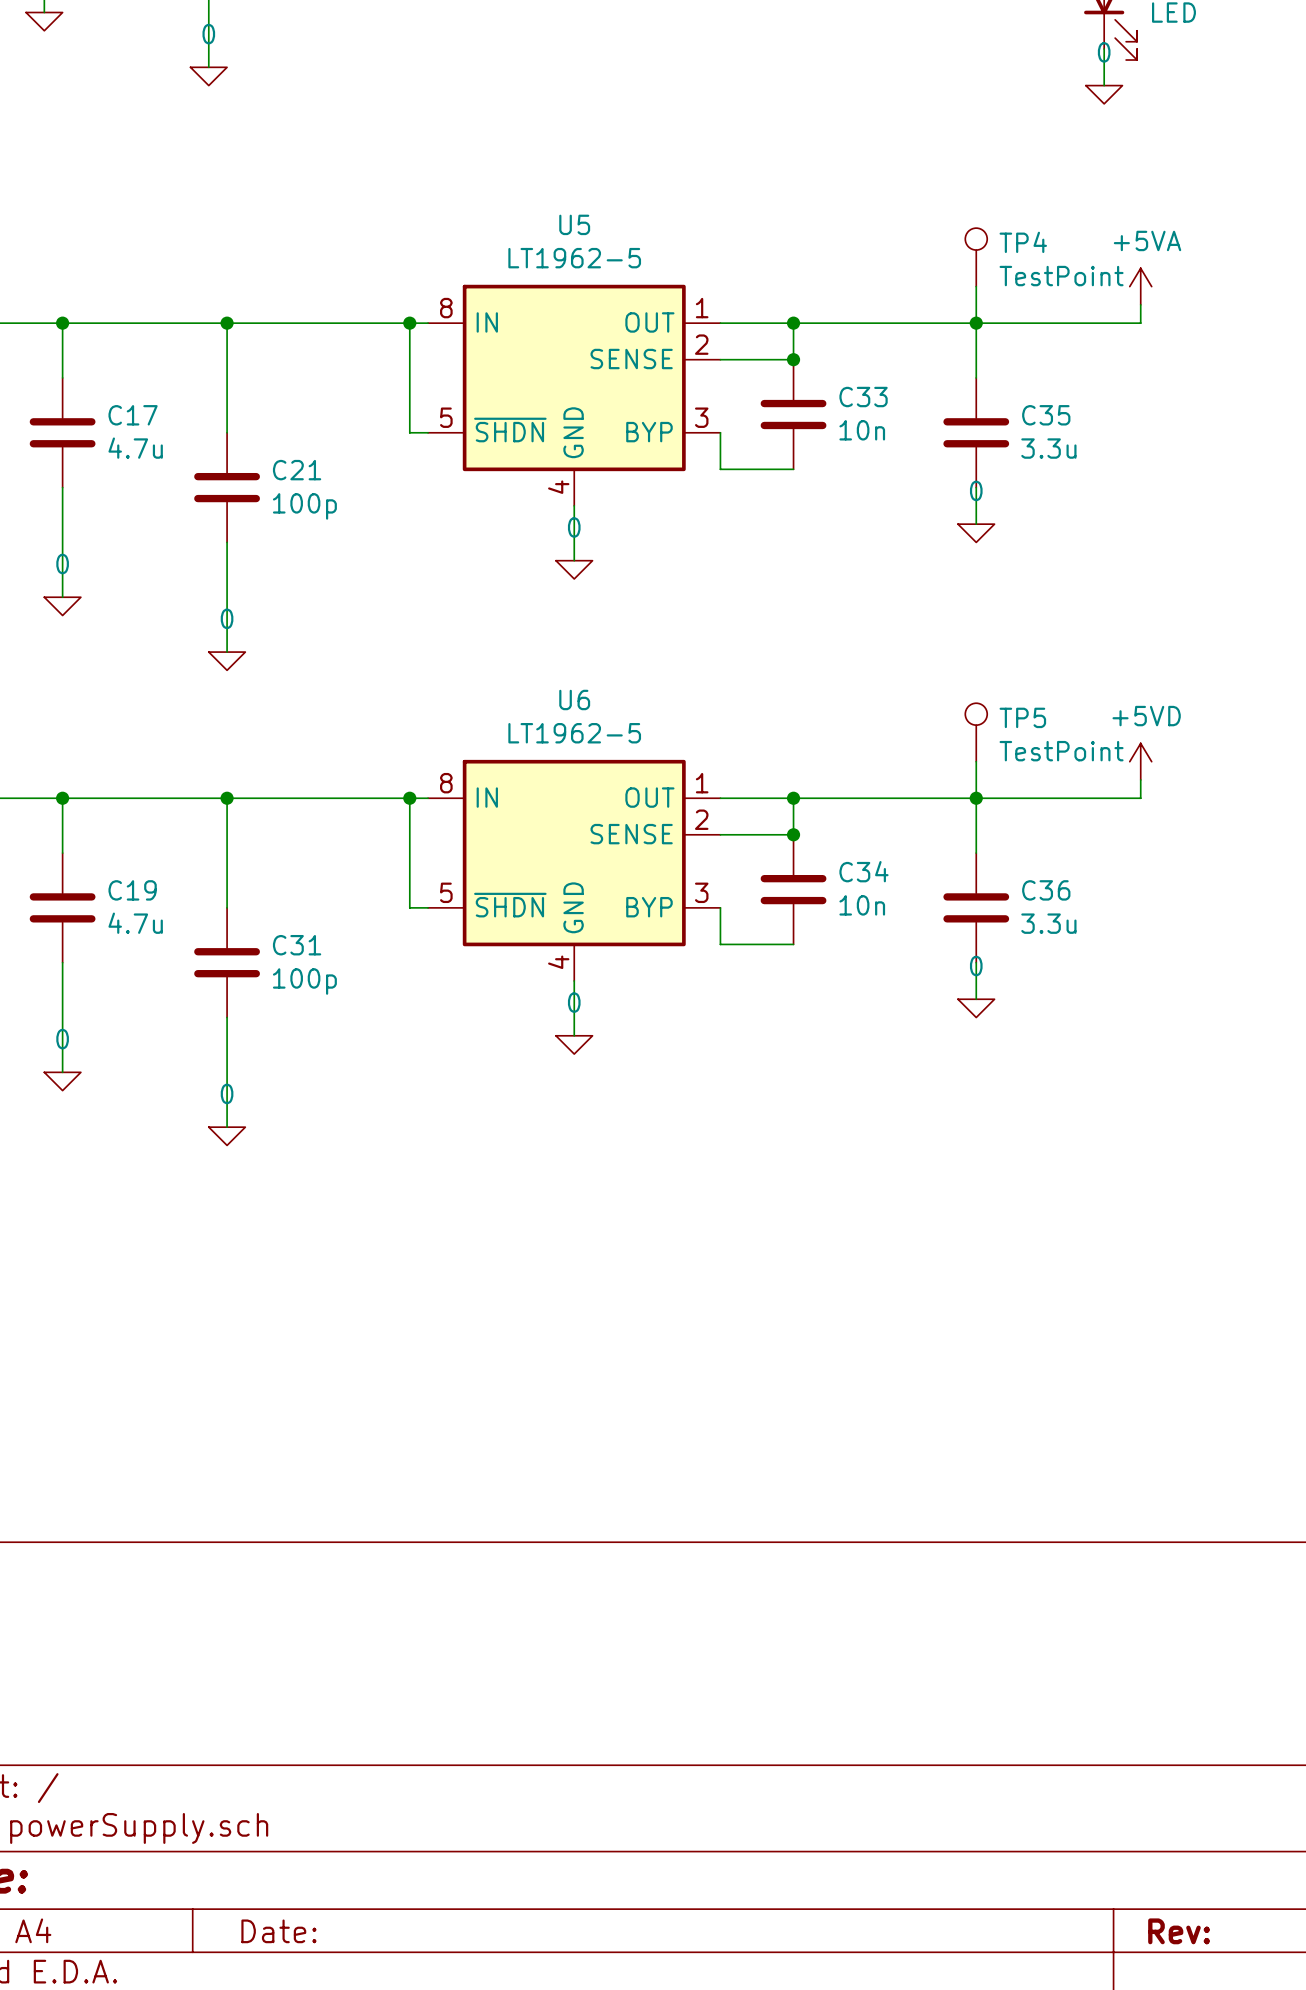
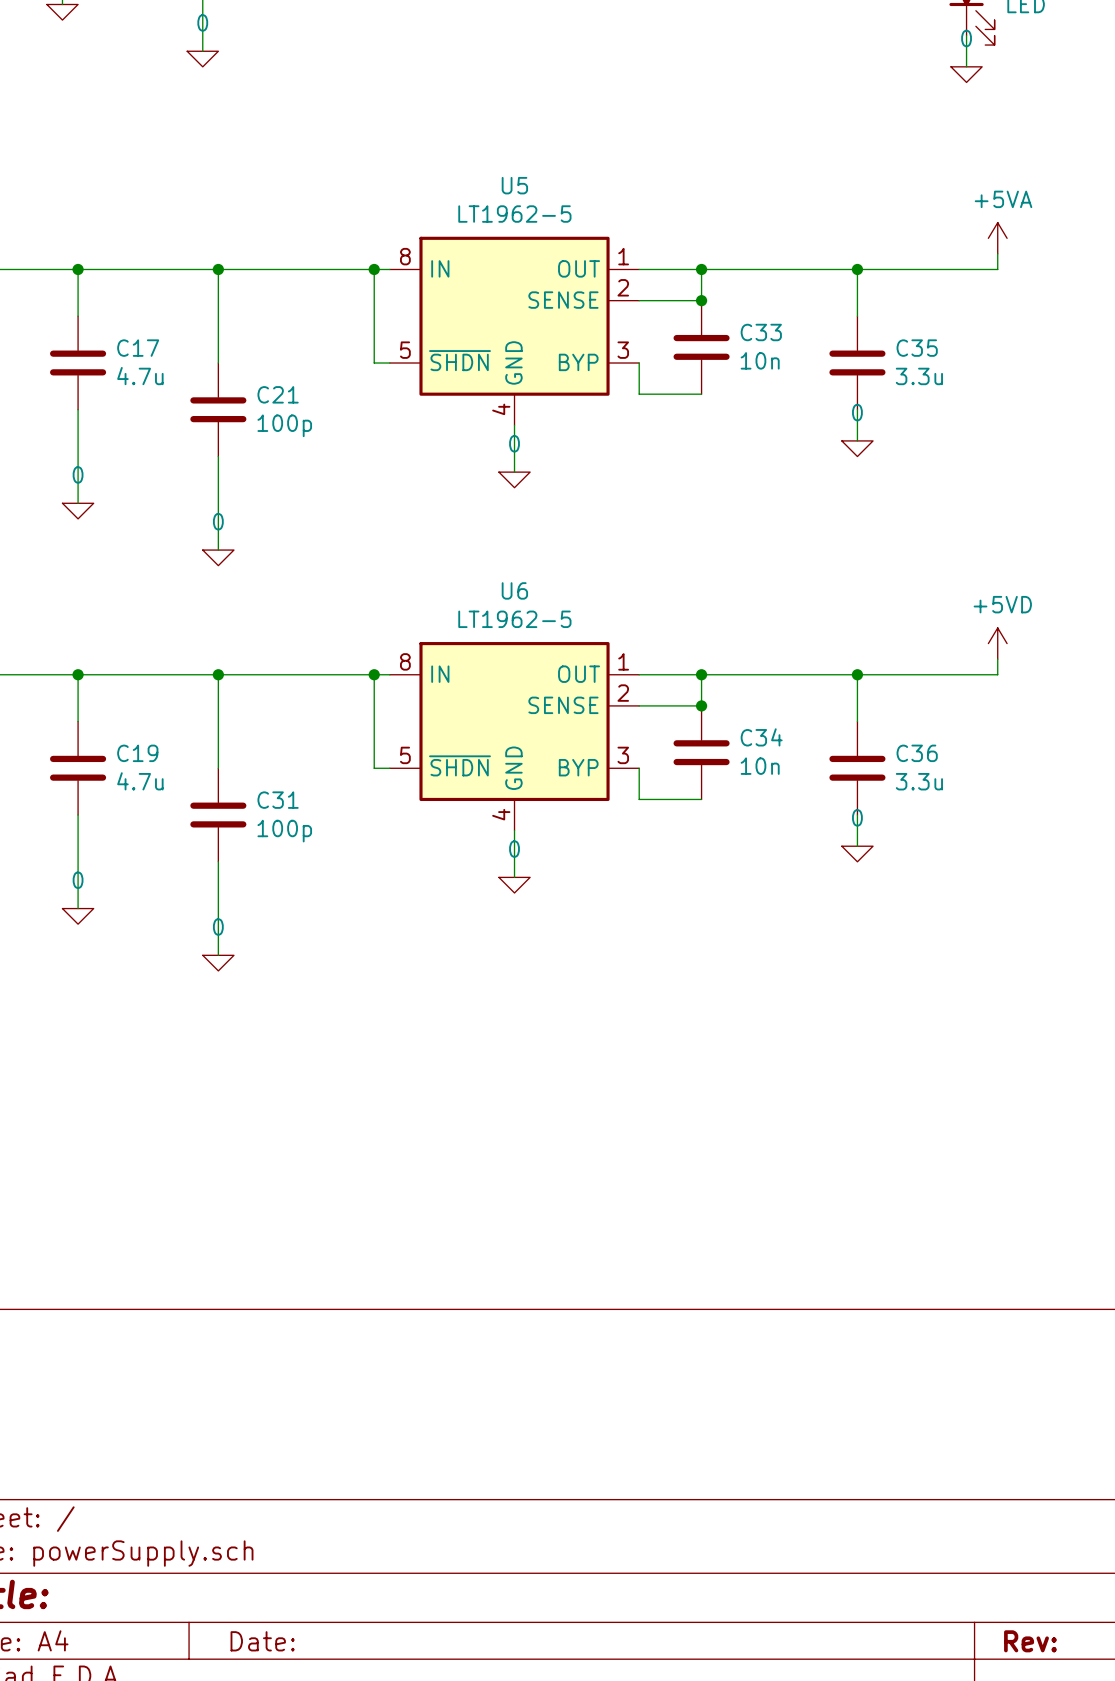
TP4: TestPoint (976, 257) -> none
wire: (976, 286) (976, 323) -> none
TP5: TestPoint (976, 732) -> none
wire: (976, 761) (976, 798) -> none

